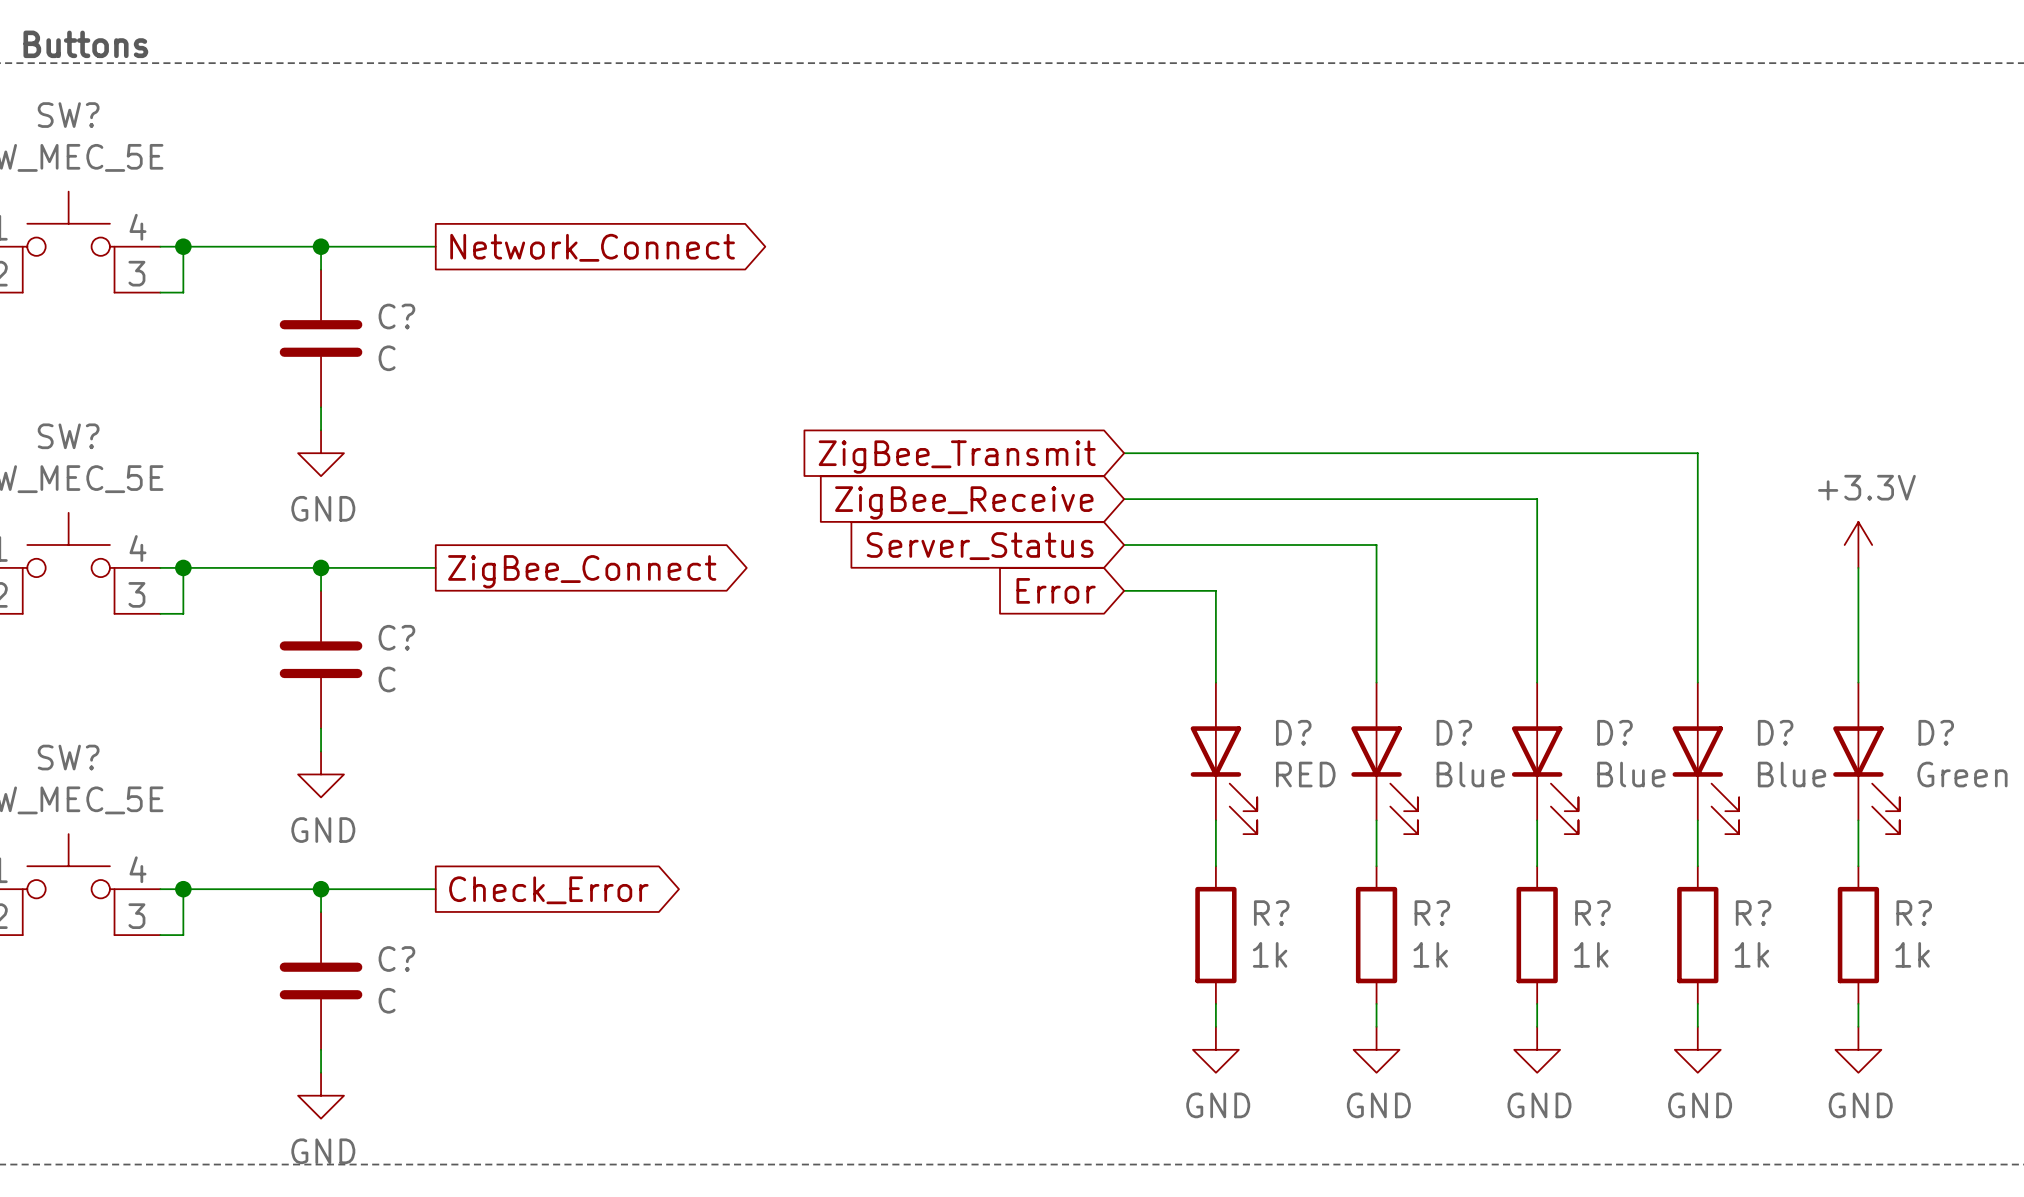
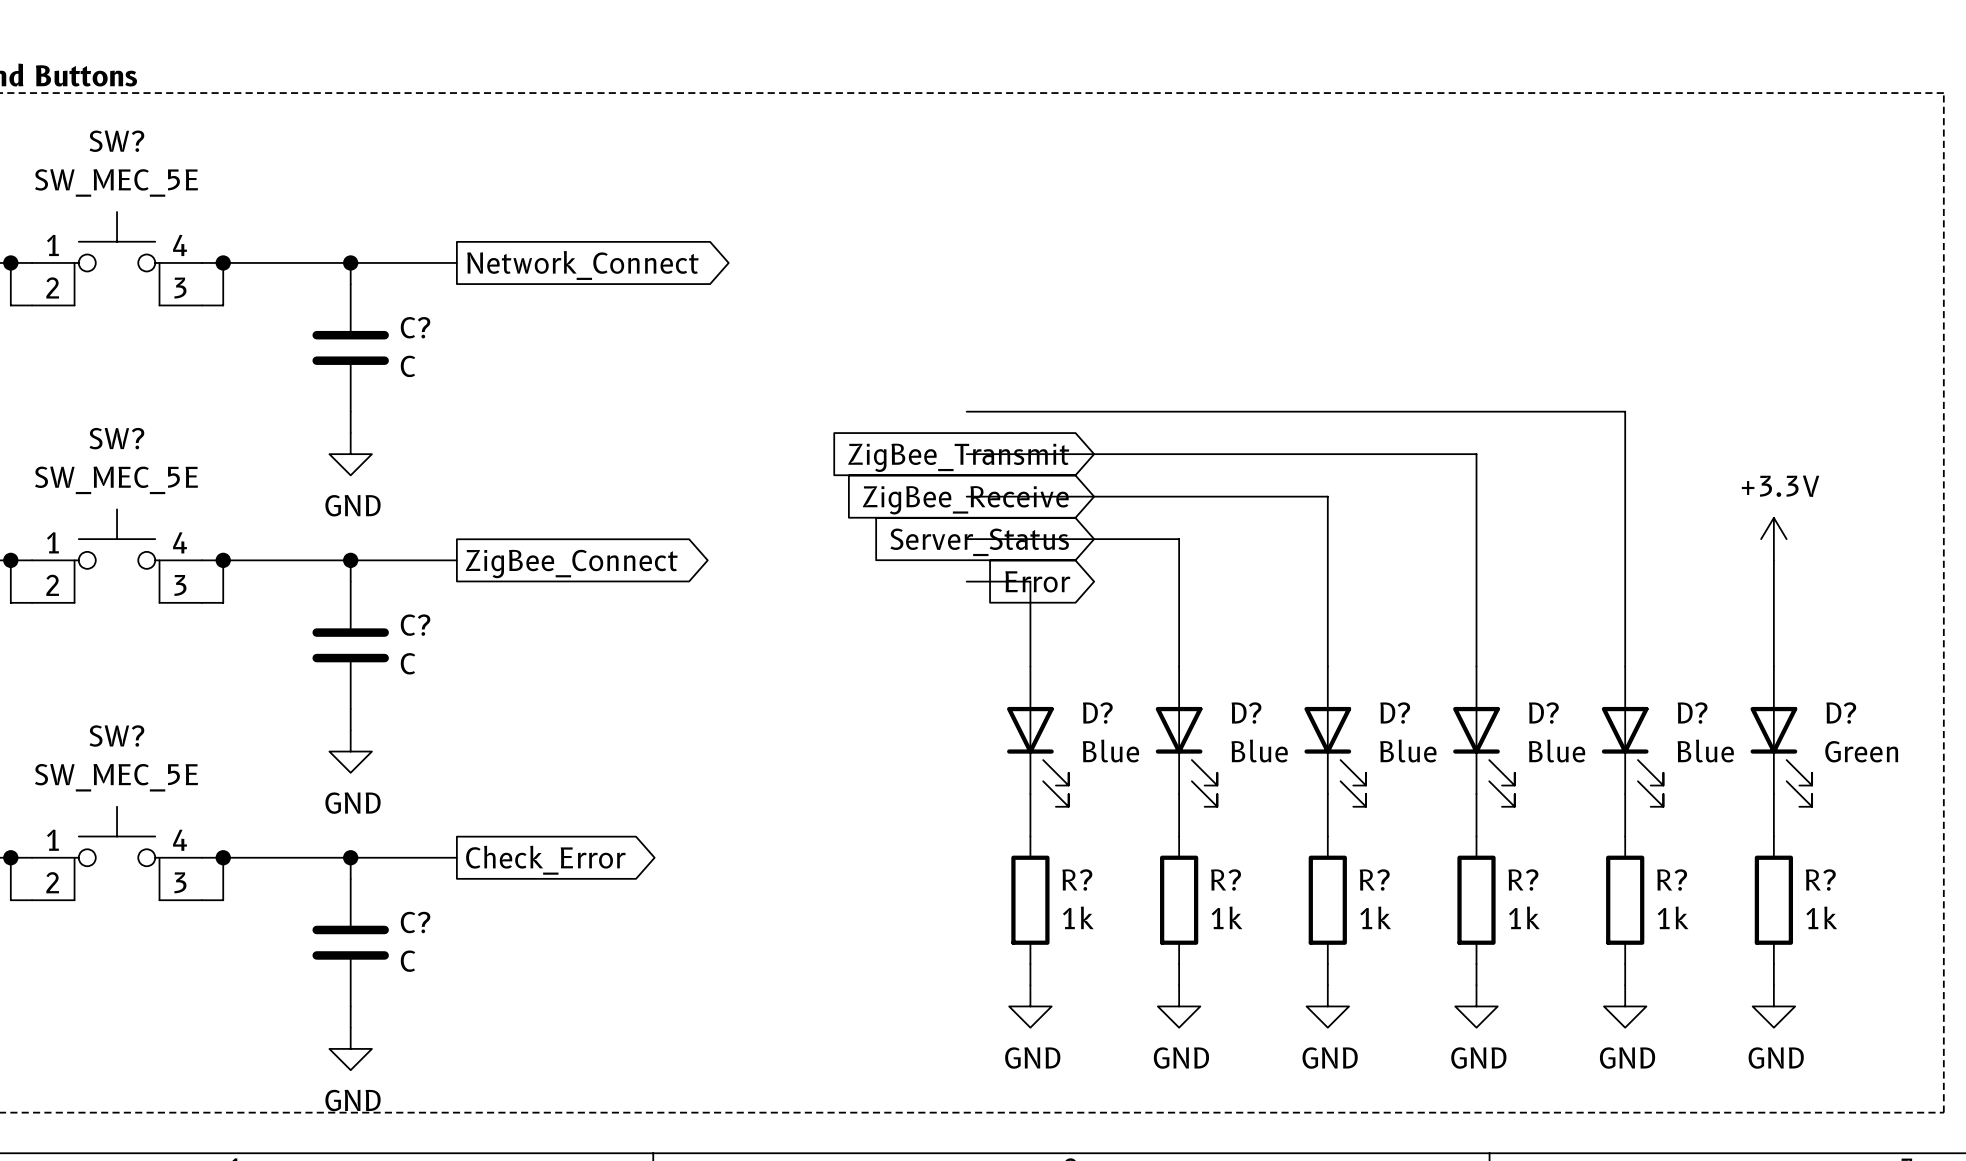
wire: none -> (966, 411) (1625, 411) (1625, 454)
wire: none -> (966, 454) (1094, 454)
wire: (1537, 453) (1697, 453) -> (1476, 454) (1476, 496)
wire: none -> (966, 496) (1094, 496)
wire: (1376, 499) (1537, 499) -> (1327, 496) (1327, 539)
wire: none -> (966, 539) (1094, 539)
wire: (1215, 544) (1376, 544) -> none
wire: none -> (966, 581) (1030, 581) (1030, 666)
wire: (1124, 590) (1215, 590) -> (1179, 539) (1179, 581)
D?: none -> Blue (1037, 736)
D? value: RED (1305, 774) -> Blue (1259, 751)
wire: none -> (1030, 794) (1030, 836)
R?: none -> 1k (1030, 900)
wire: none -> (1030, 963) (1030, 985)
power symbol: none -> GND (1030, 1006)

